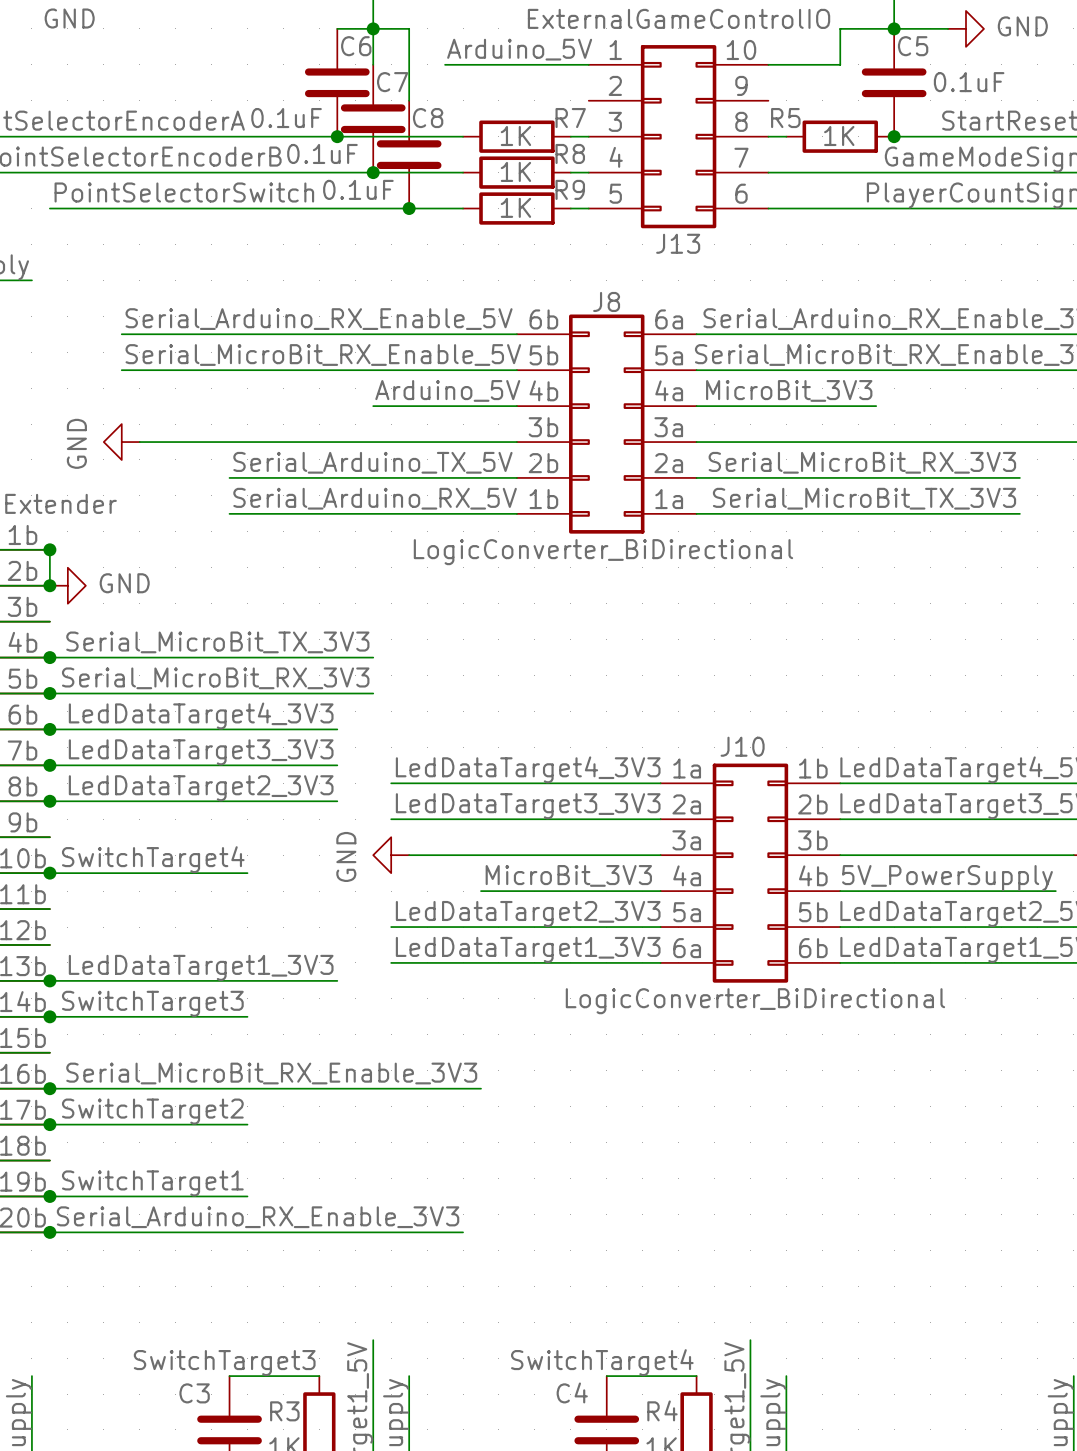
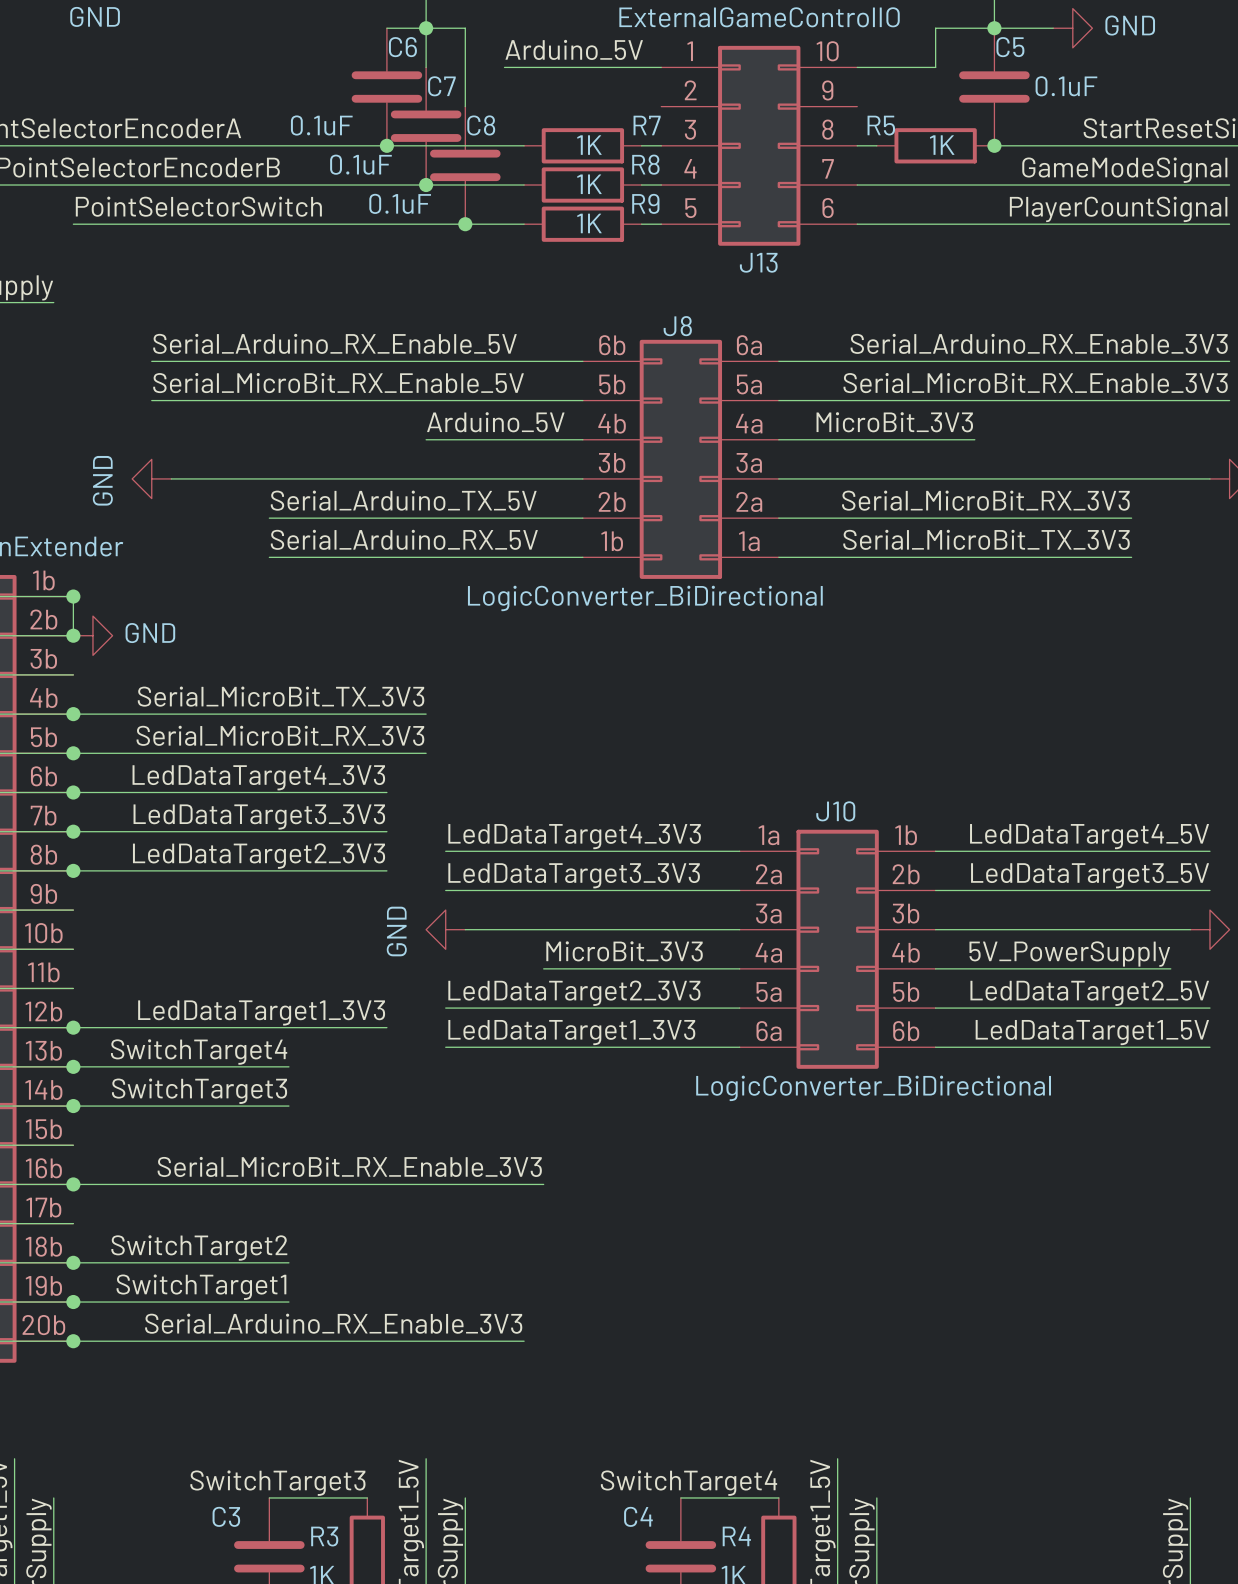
label position: SwitchTarget4 (153, 859) -> SwitchTarget4 (199, 1052)
wire: (49, 873) (247, 873) -> none
junction position: (49, 873) -> (73, 1027)
wire: none -> (73, 1027) (386, 1027)
label position: LedDataTarget1_3V3 (201, 967) -> LedDataTarget1_3V3 (261, 1012)
wire: (247, 980) (337, 980) -> none
label position: SwitchTarget2 (152, 1111) -> SwitchTarget2 (199, 1247)
wire: (49, 1124) (247, 1124) -> (73, 1262) (288, 1262)
junction position: (49, 1124) -> (73, 1262)

